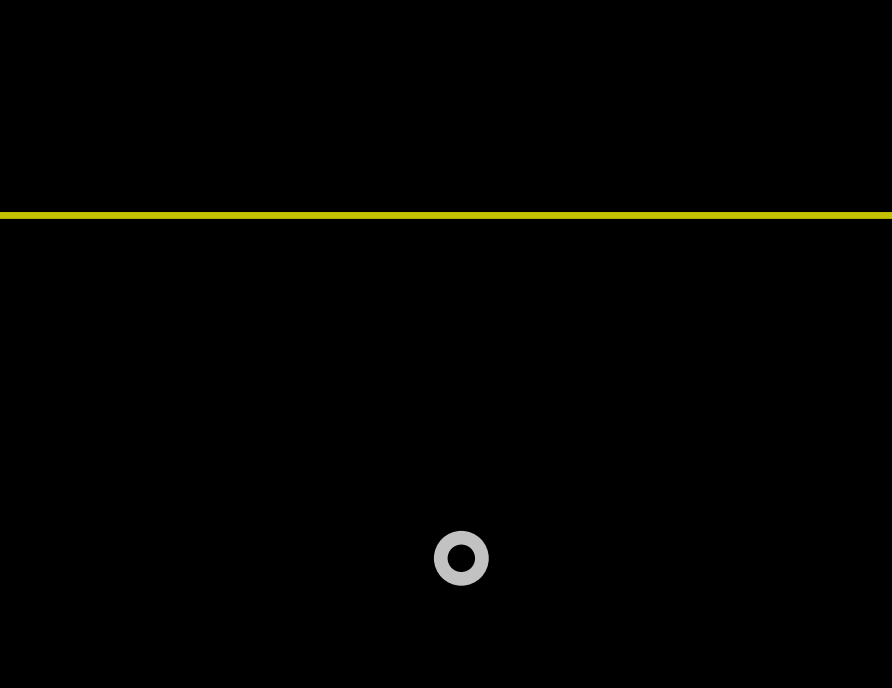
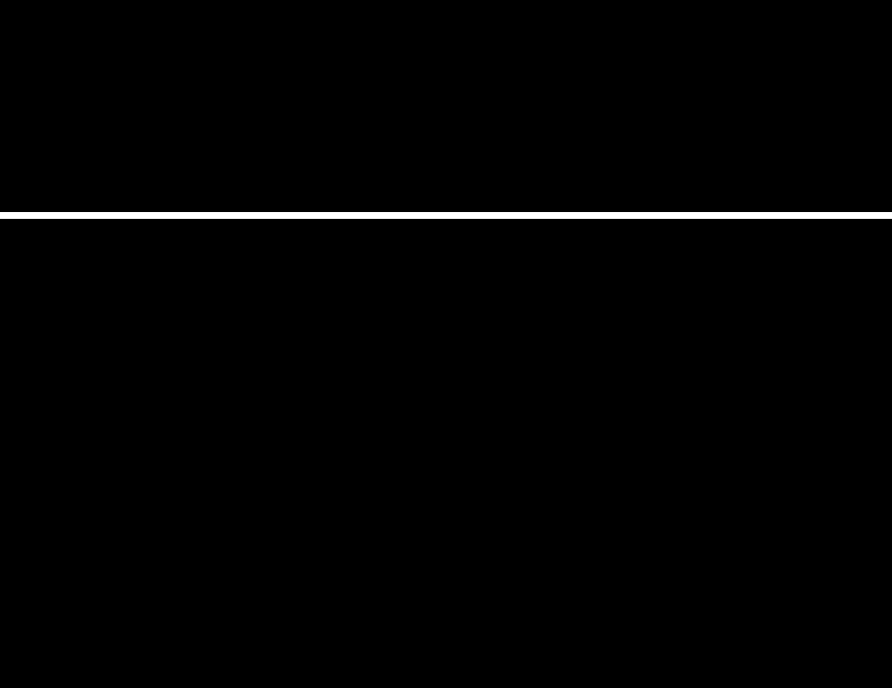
via: (461, 558) -> none

